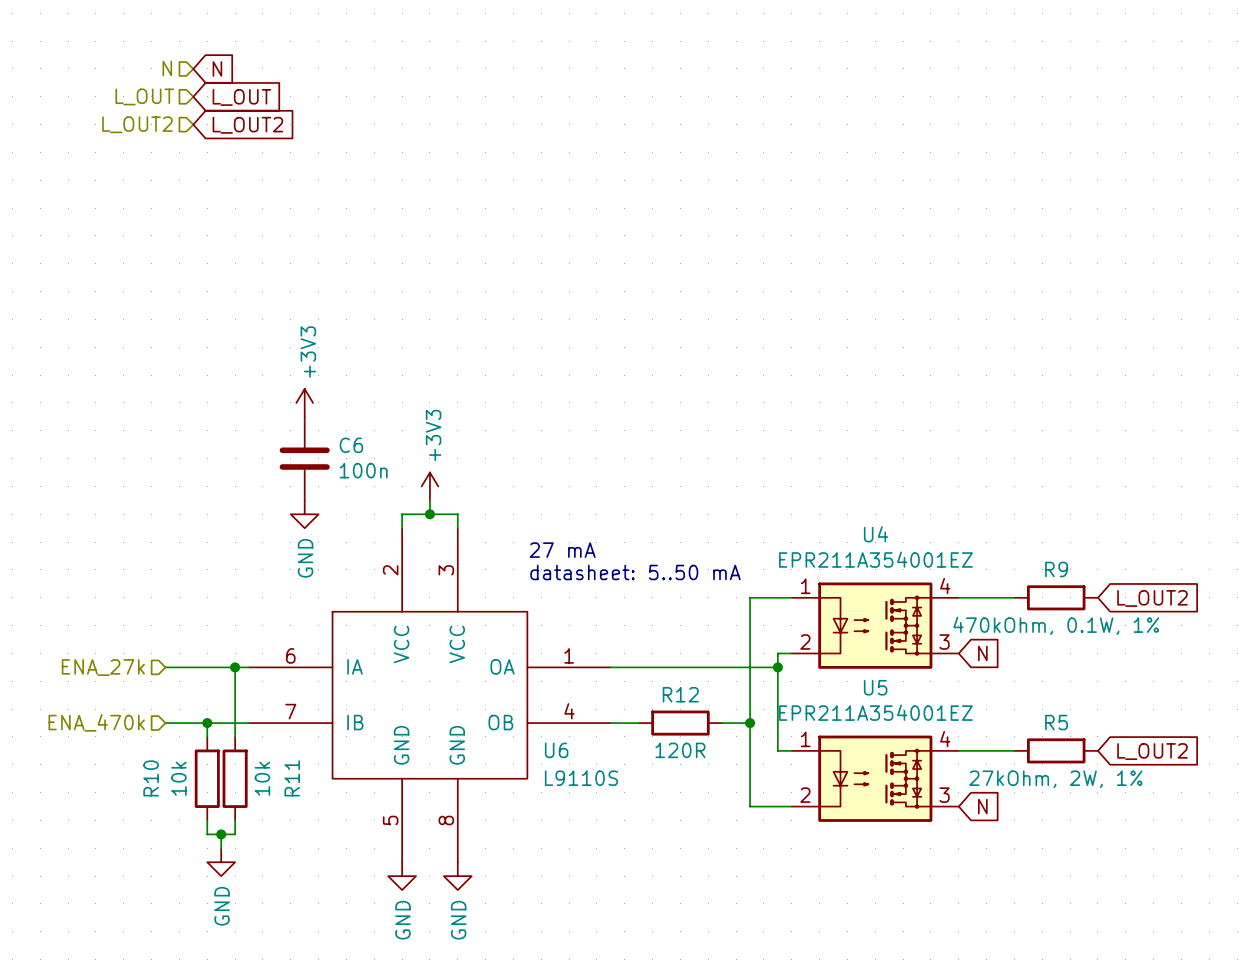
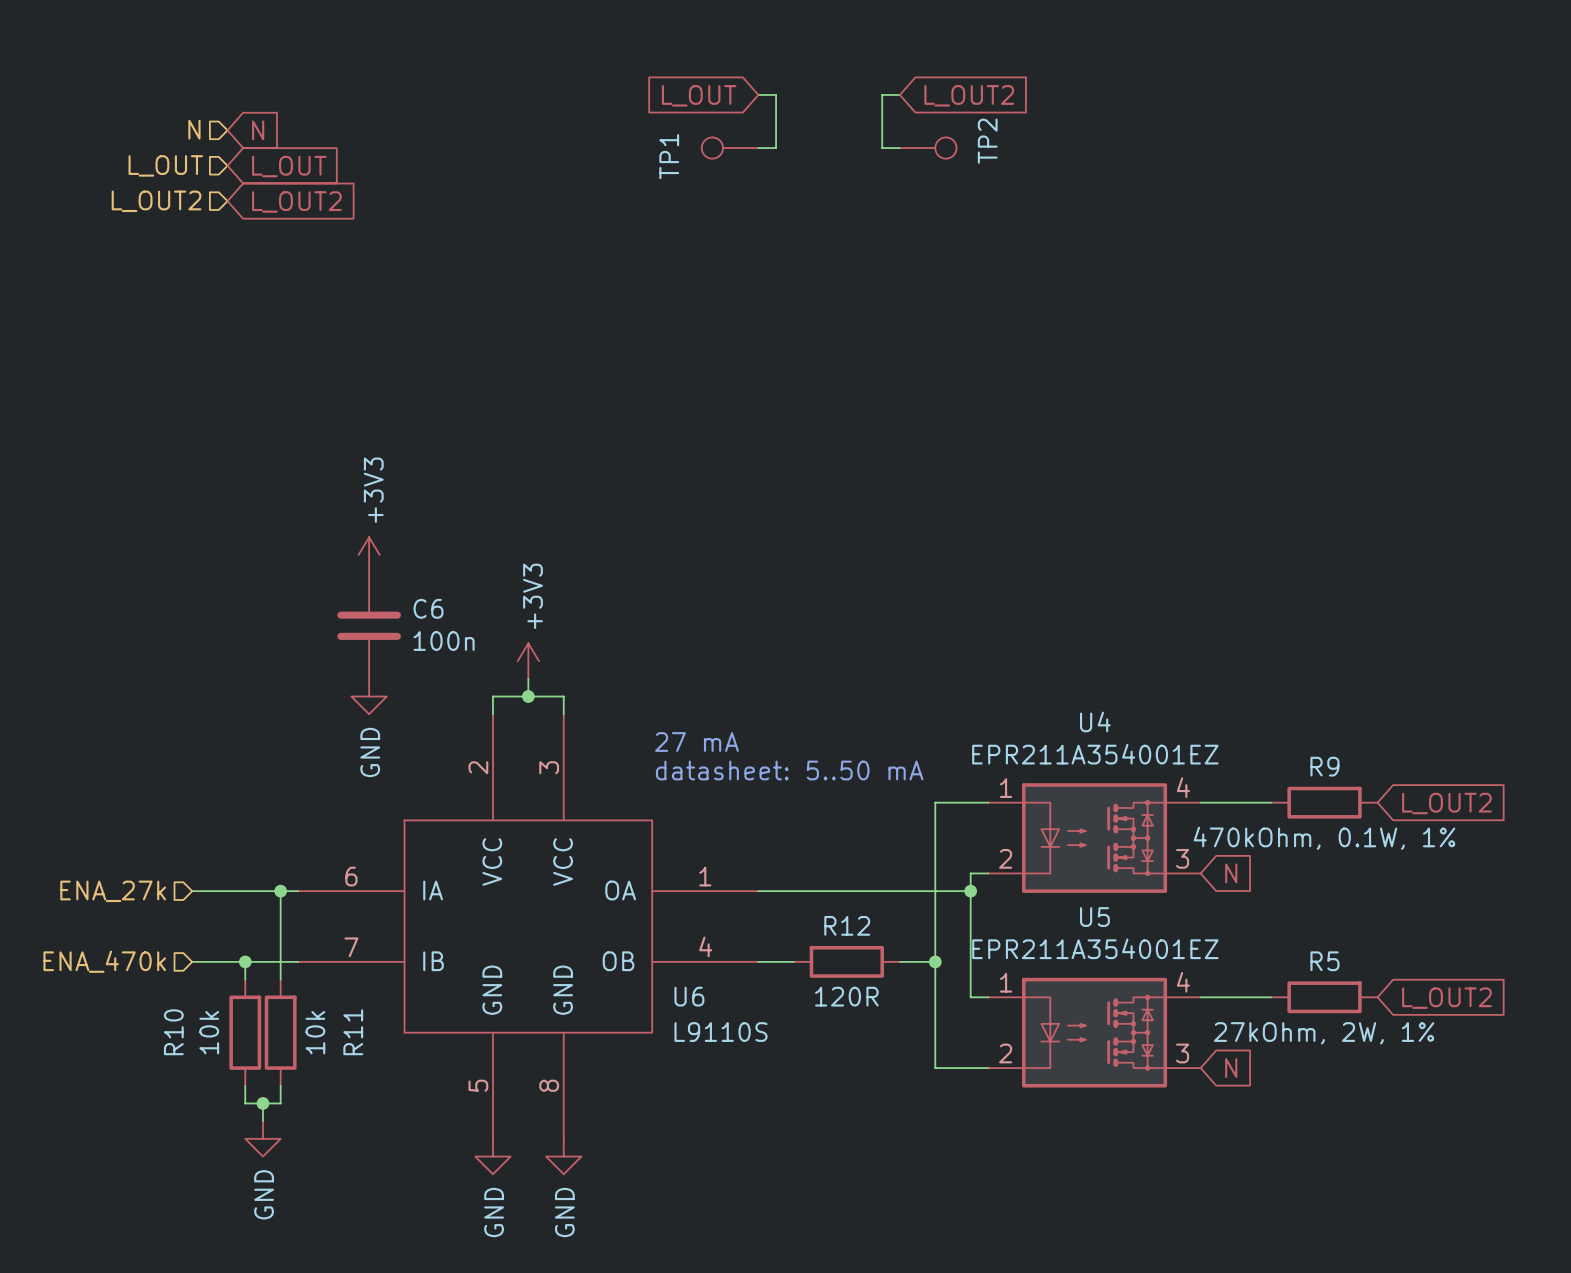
global label: none -> L_OUT (699, 95)
wire: none -> (758, 94) (776, 94) (776, 148) (758, 148)
wire: none -> (899, 94) (882, 94) (882, 148) (899, 148)
global label: none -> L_OUT2 (969, 95)
TP1: none -> (730, 148)
TP2: none -> (928, 148)

